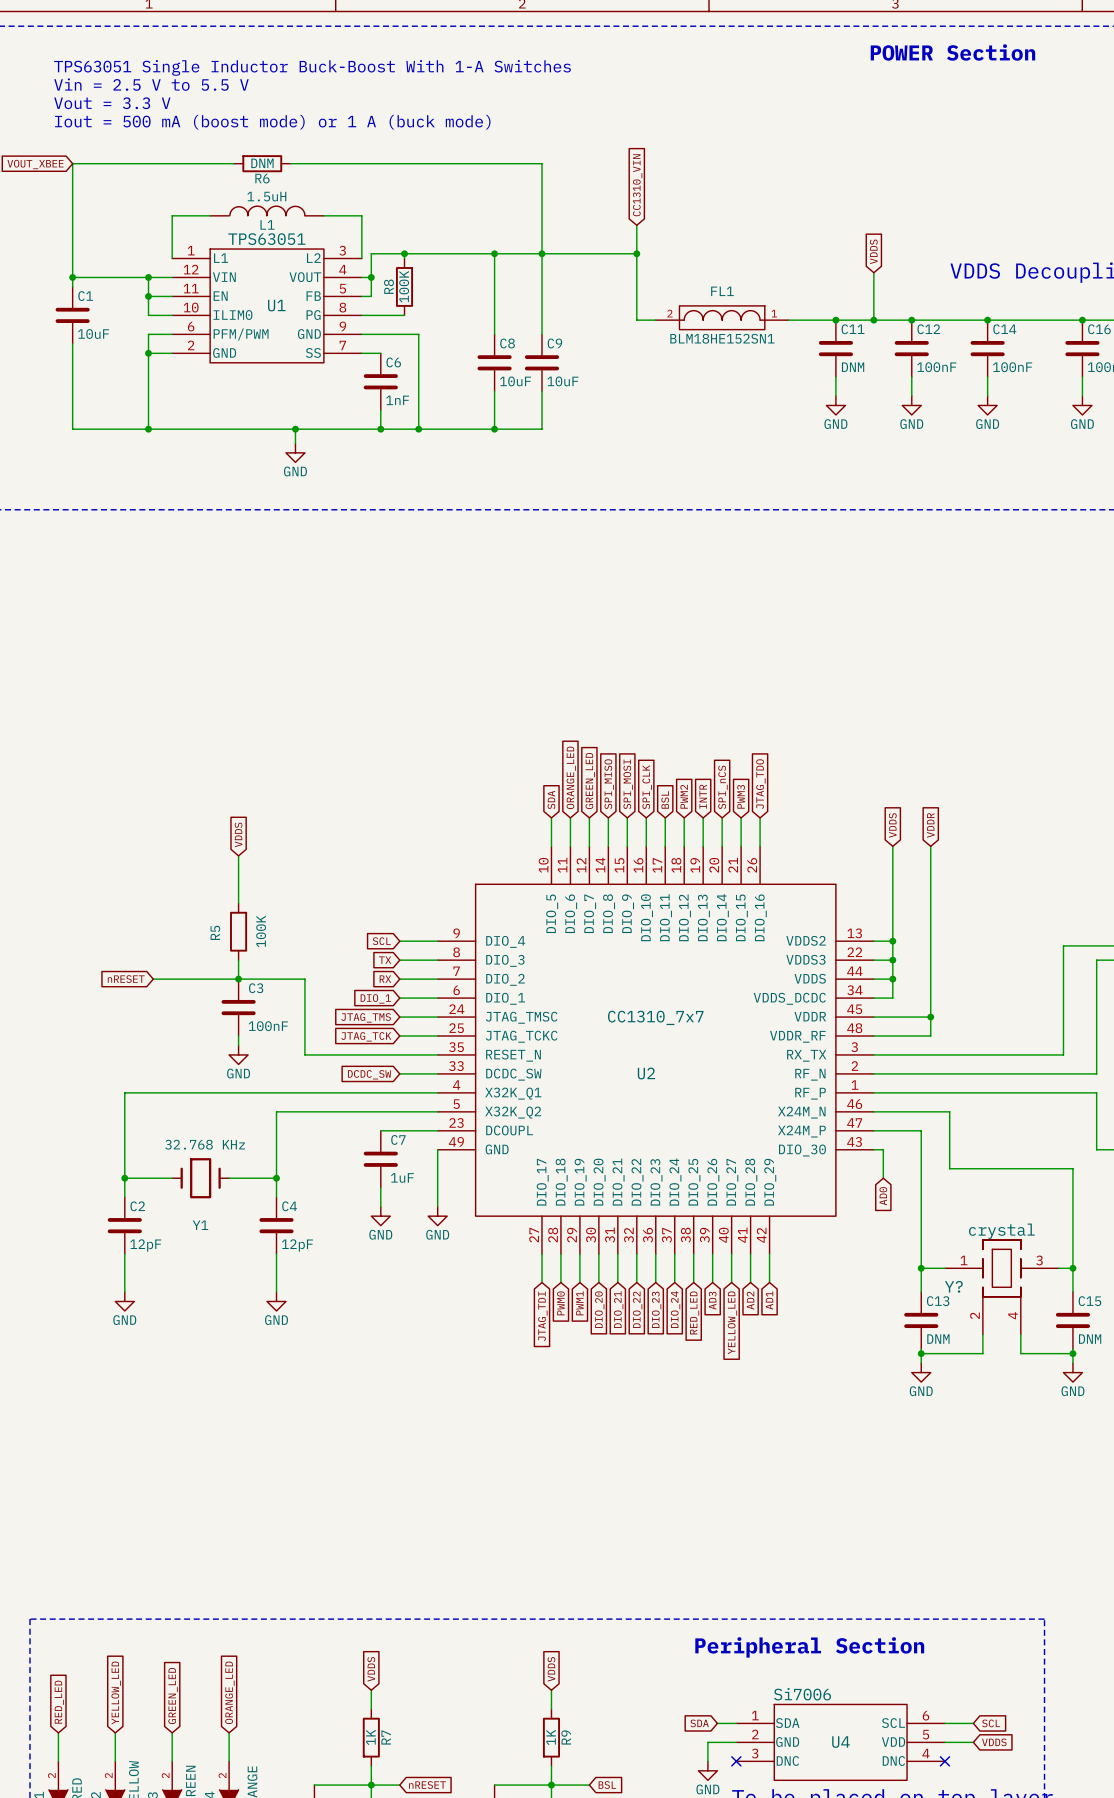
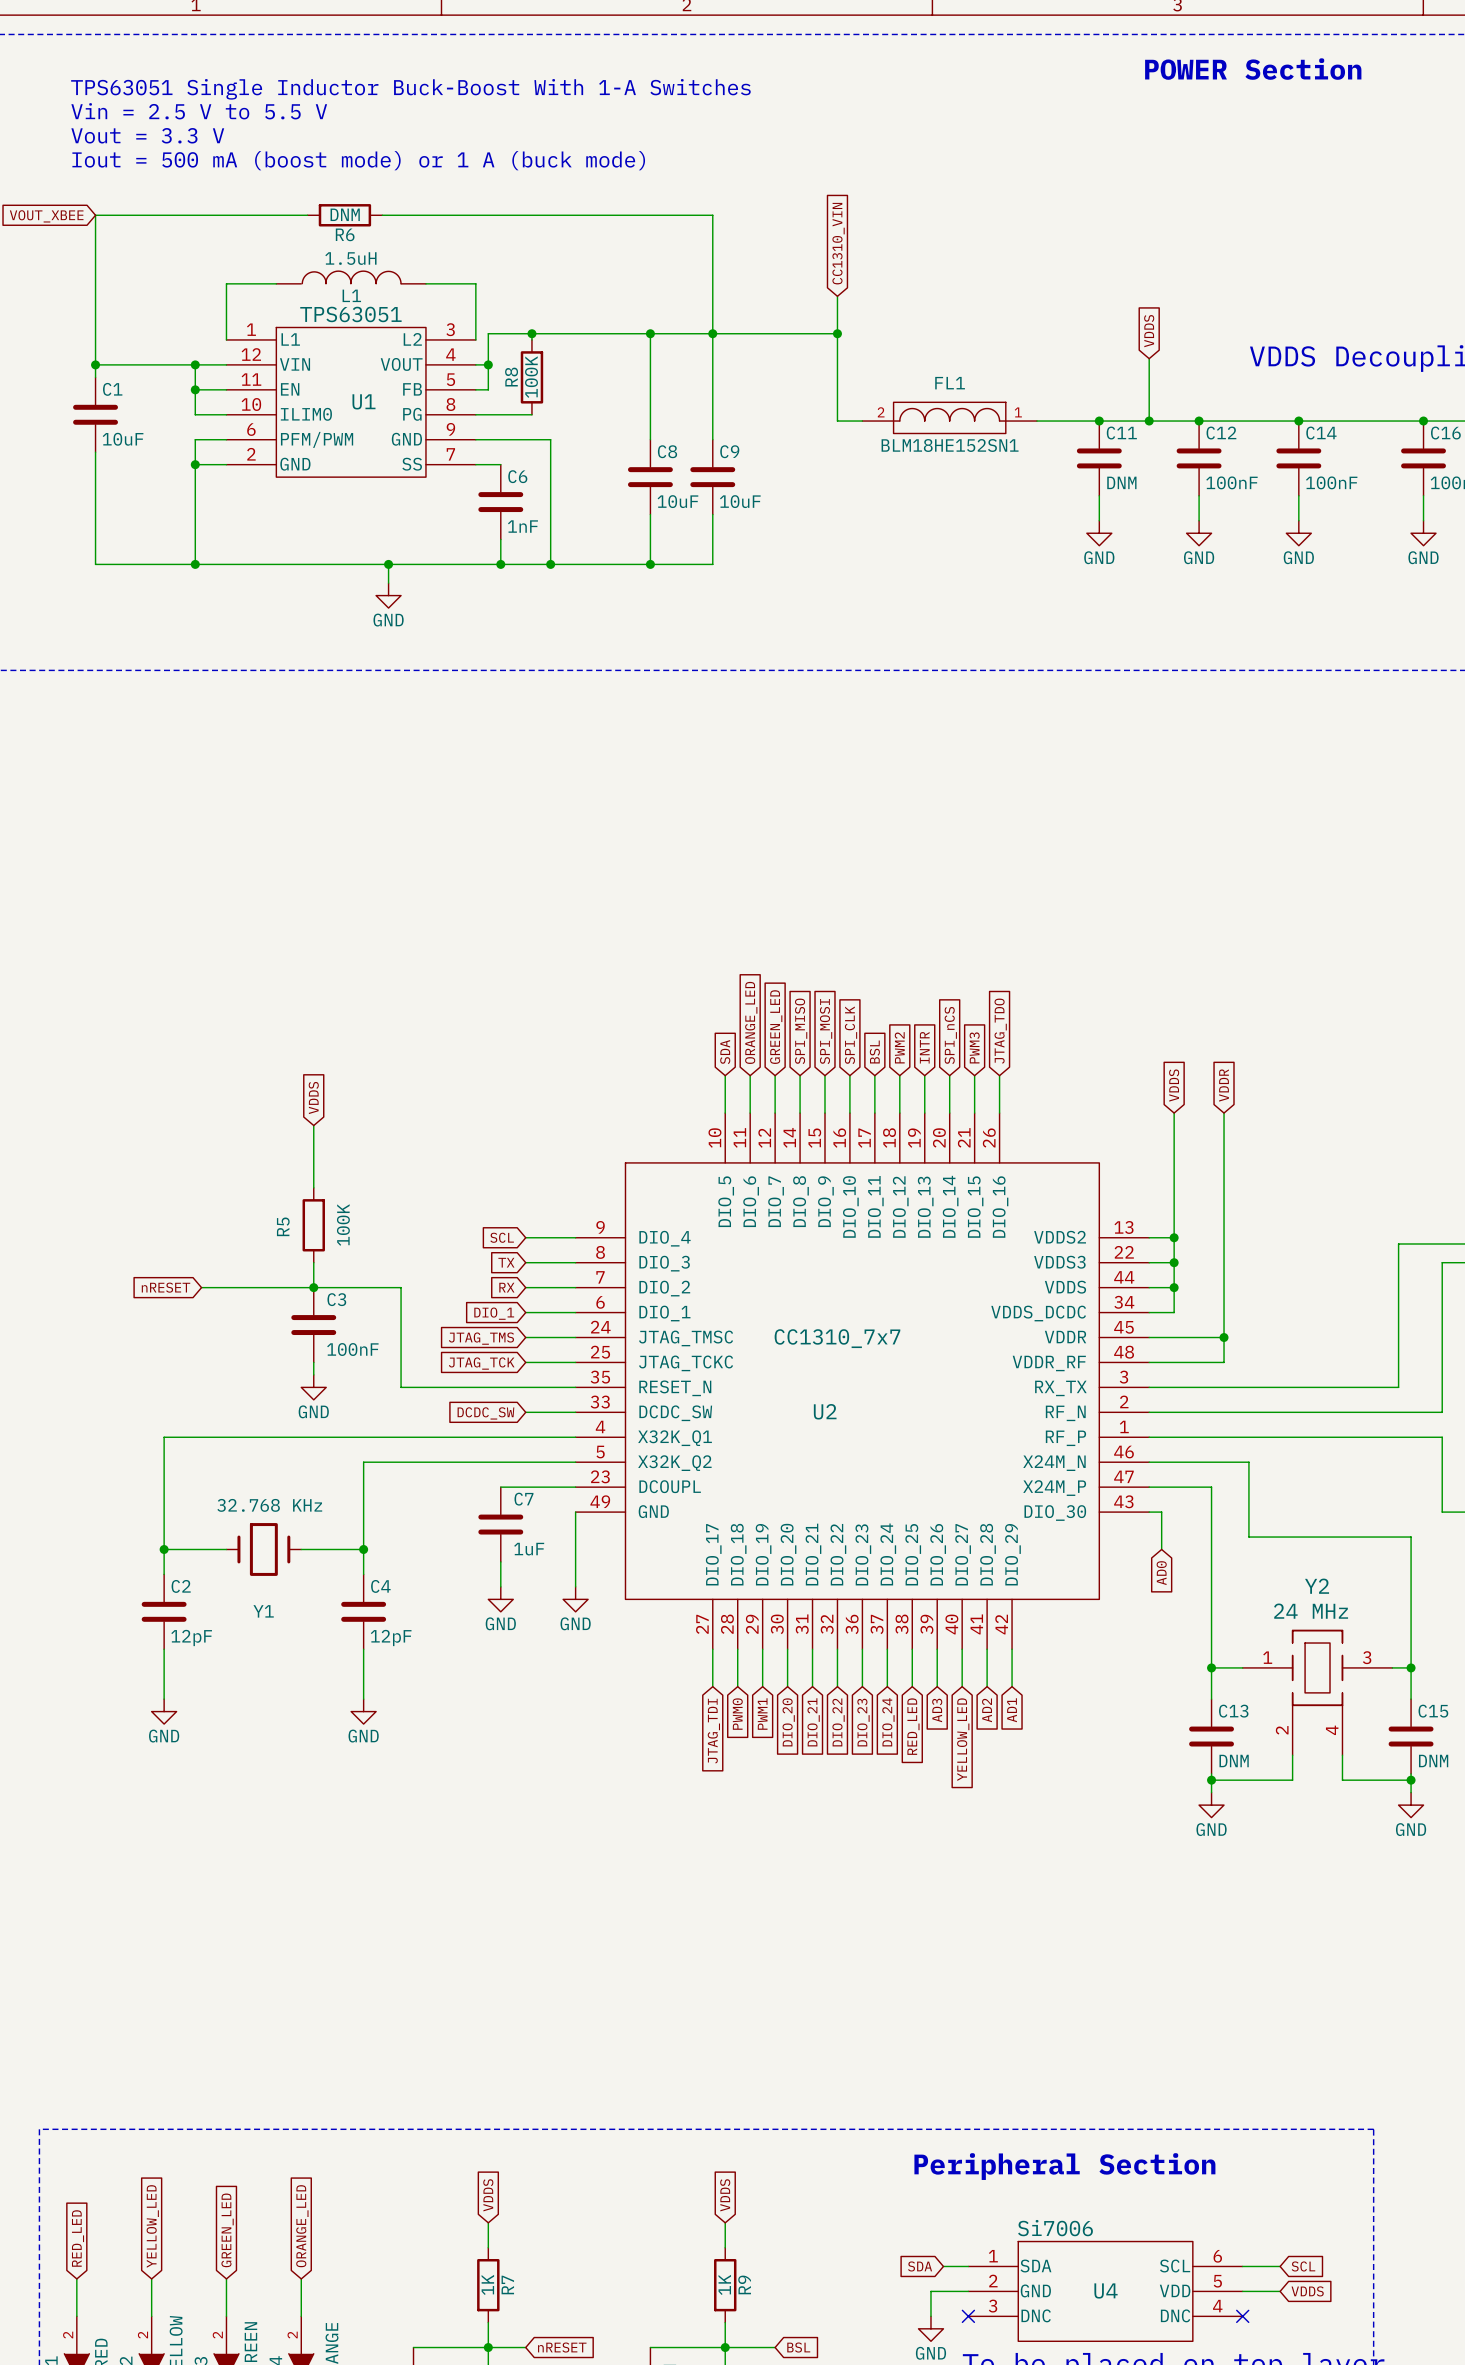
U2 value position: CC1310_7x7 (655, 1017) -> CC1310_7x7 (837, 1338)
U2 name position: U2 (646, 1073) -> U2 (825, 1411)
Y? value: crystal (1001, 1231) -> 24 MHz (1311, 1611)
Y? name: Y? (953, 1286) -> Y2 (1317, 1586)

